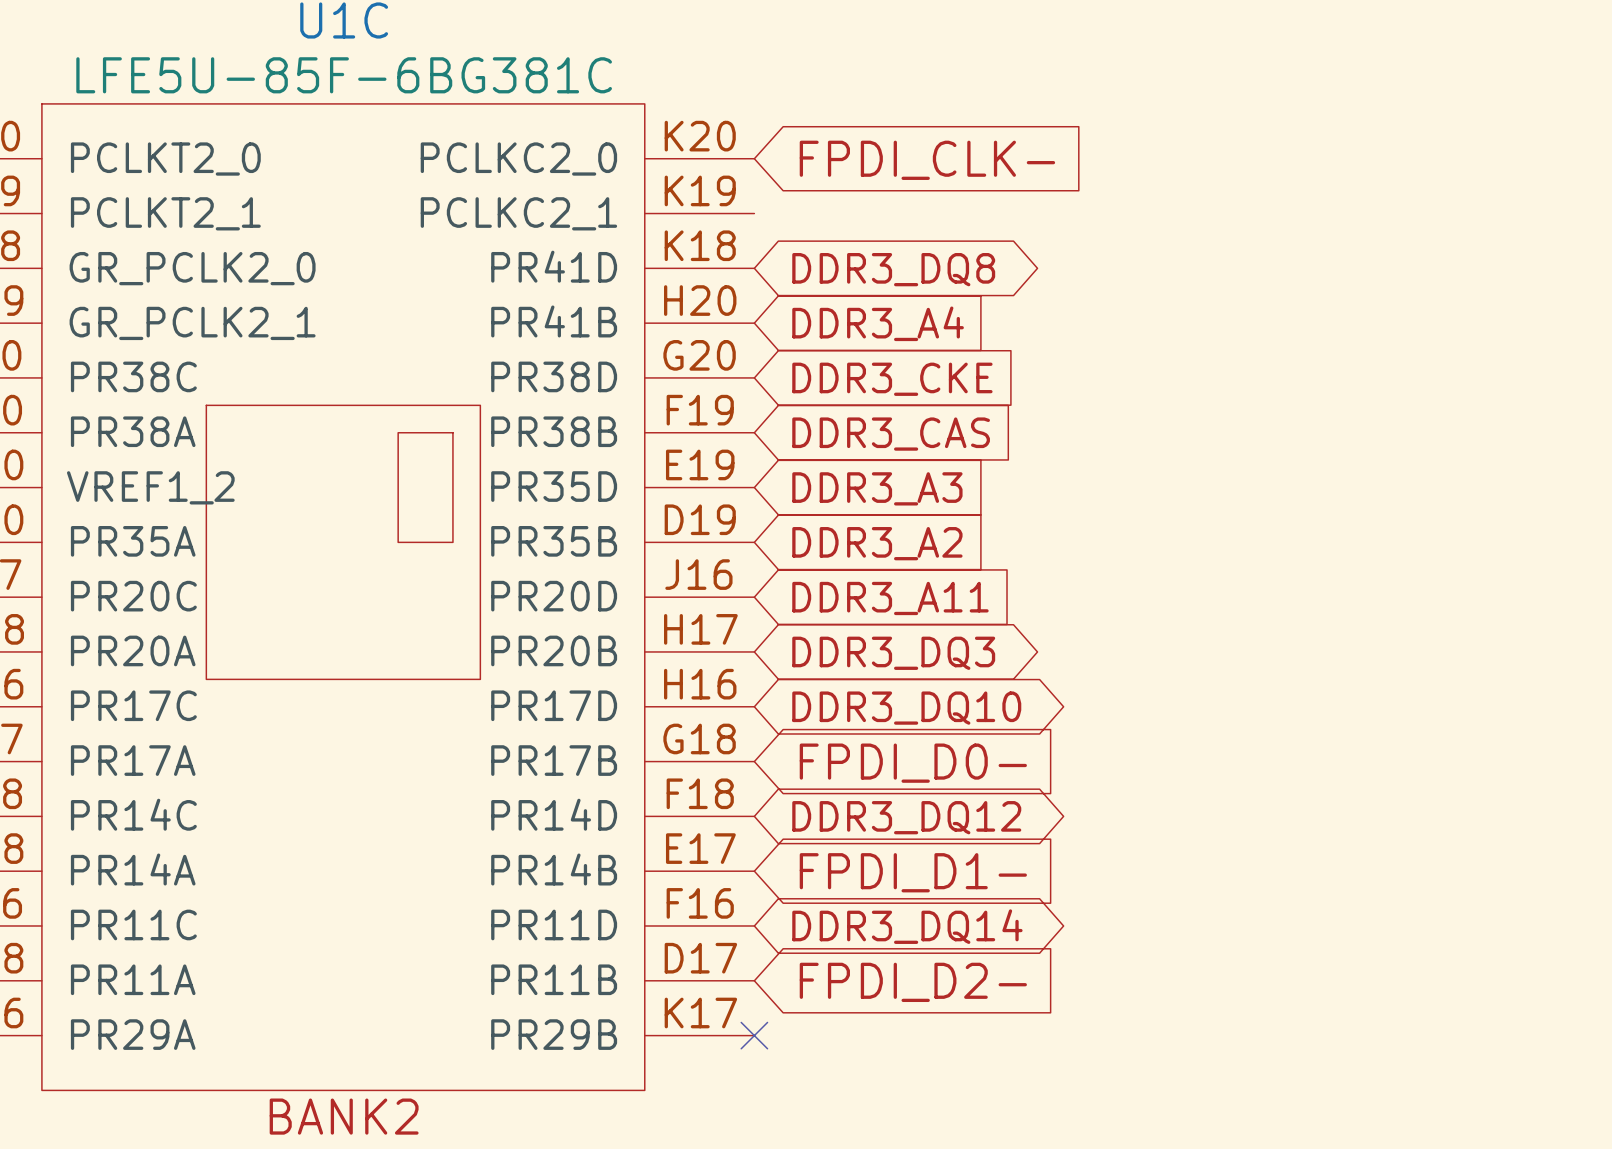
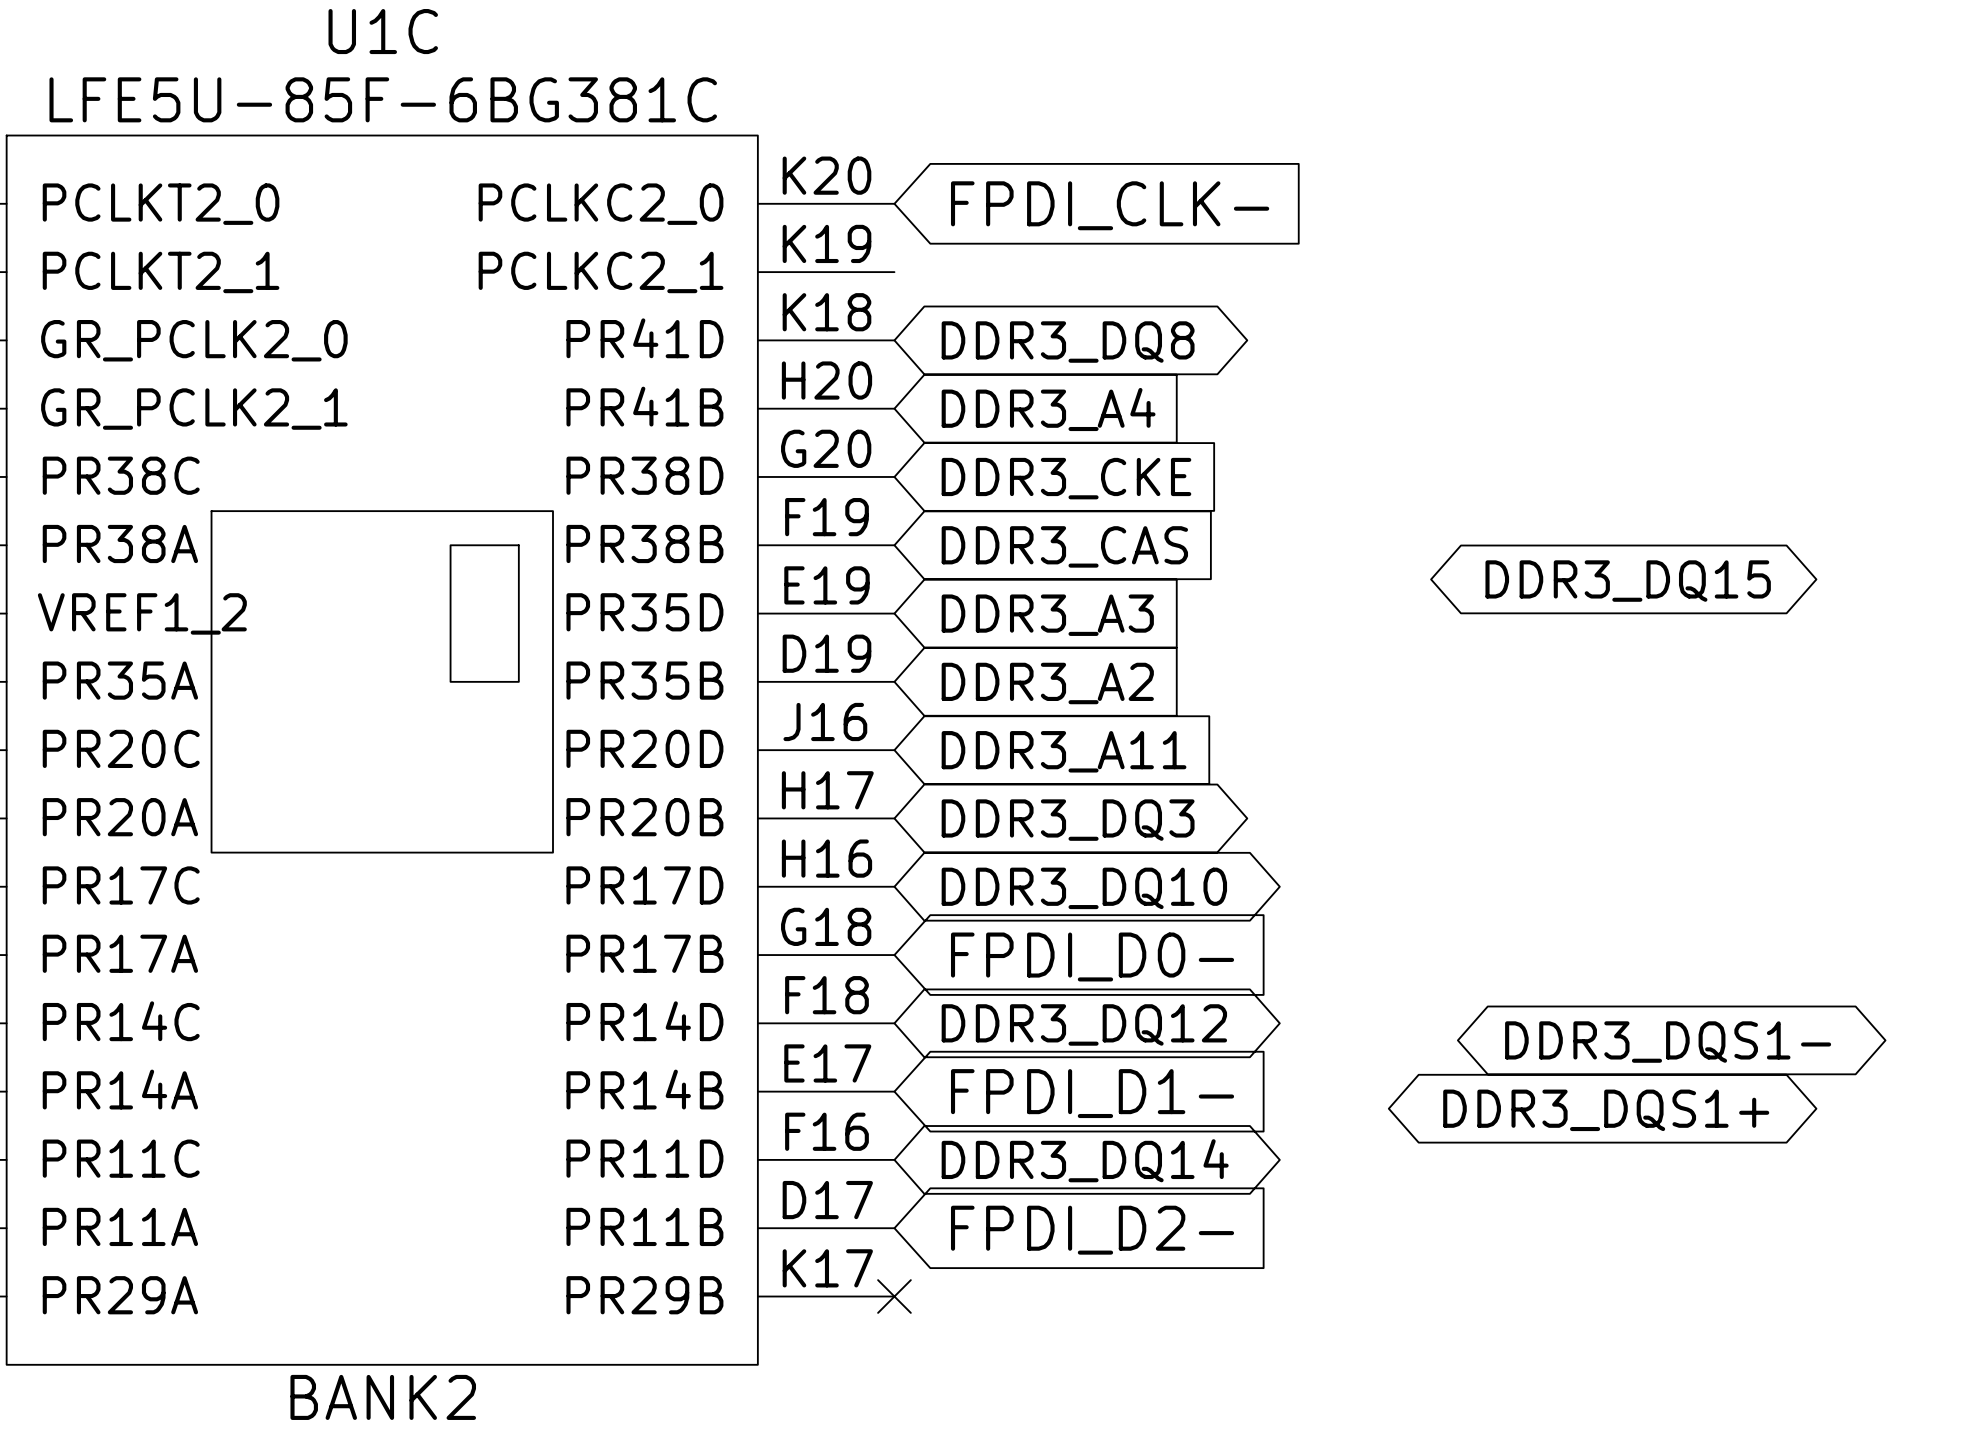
global label: none -> DDR3_DQ15 (1628, 581)
global label: none -> DDR3_DQS1- (1668, 1042)
global label: none -> DDR3_DQS1+ (1606, 1110)

